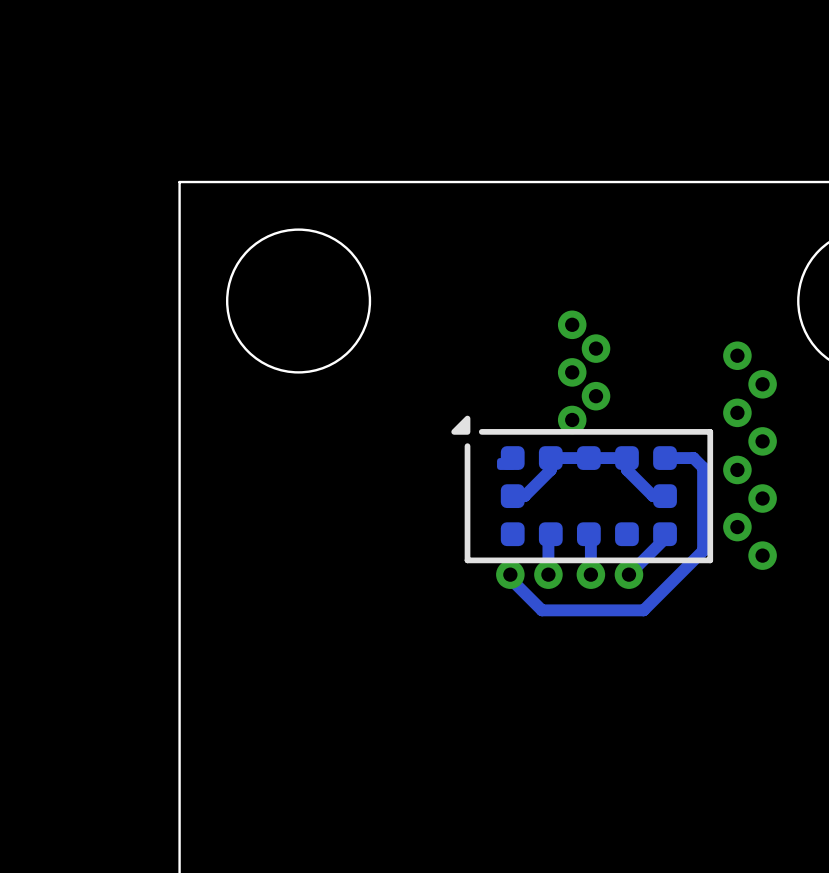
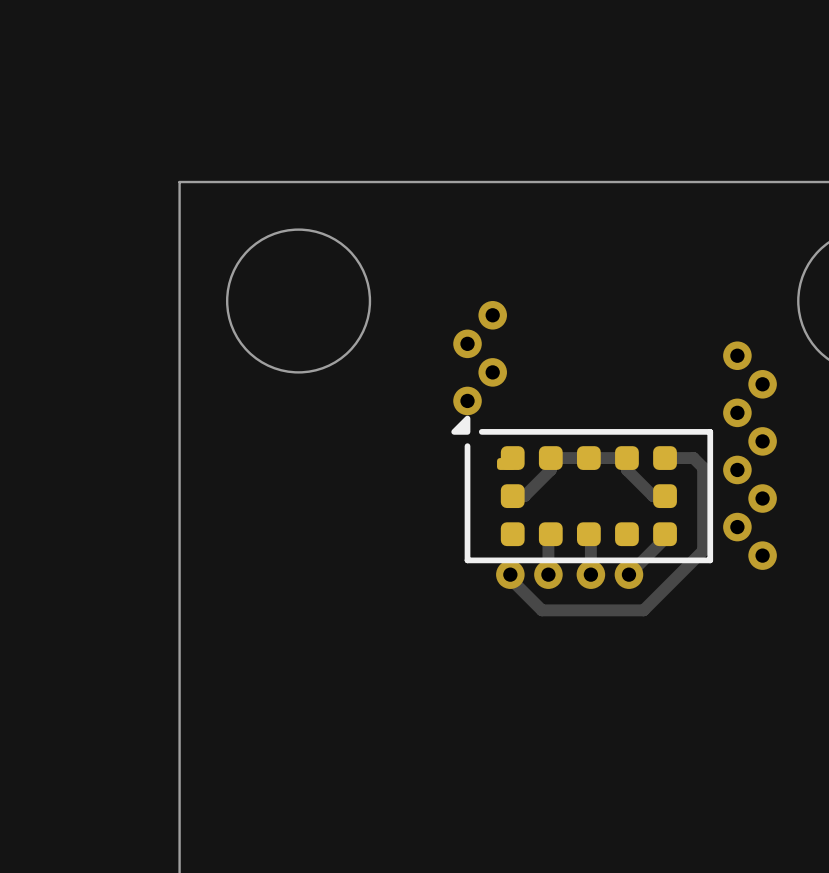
via: none -> (492, 315)
via: (572, 324) -> none
via: none -> (467, 343)
via: (596, 348) -> none
via: none -> (492, 372)
via: (572, 372) -> none
via: (596, 396) -> none
via: none -> (467, 400)
via: (572, 419) -> none

